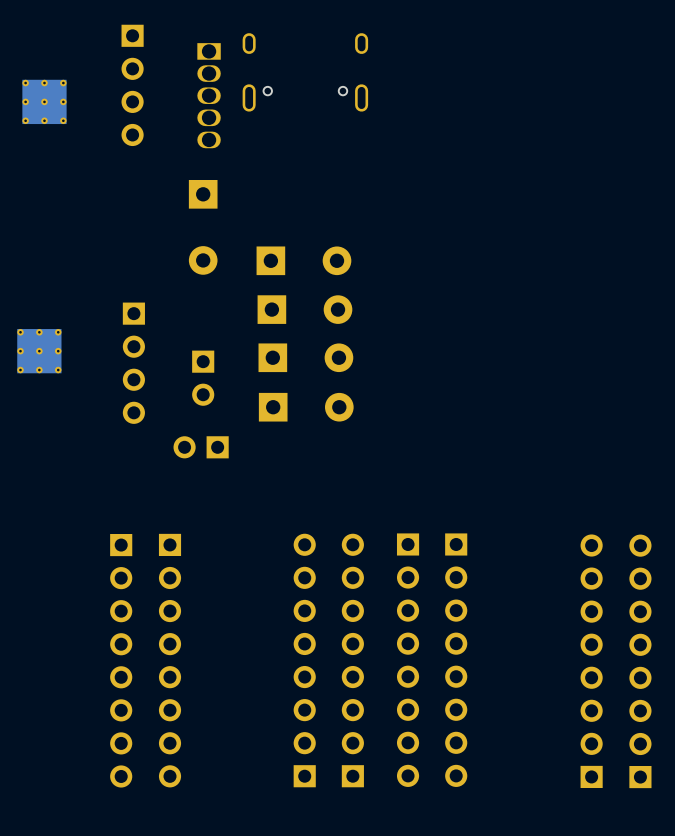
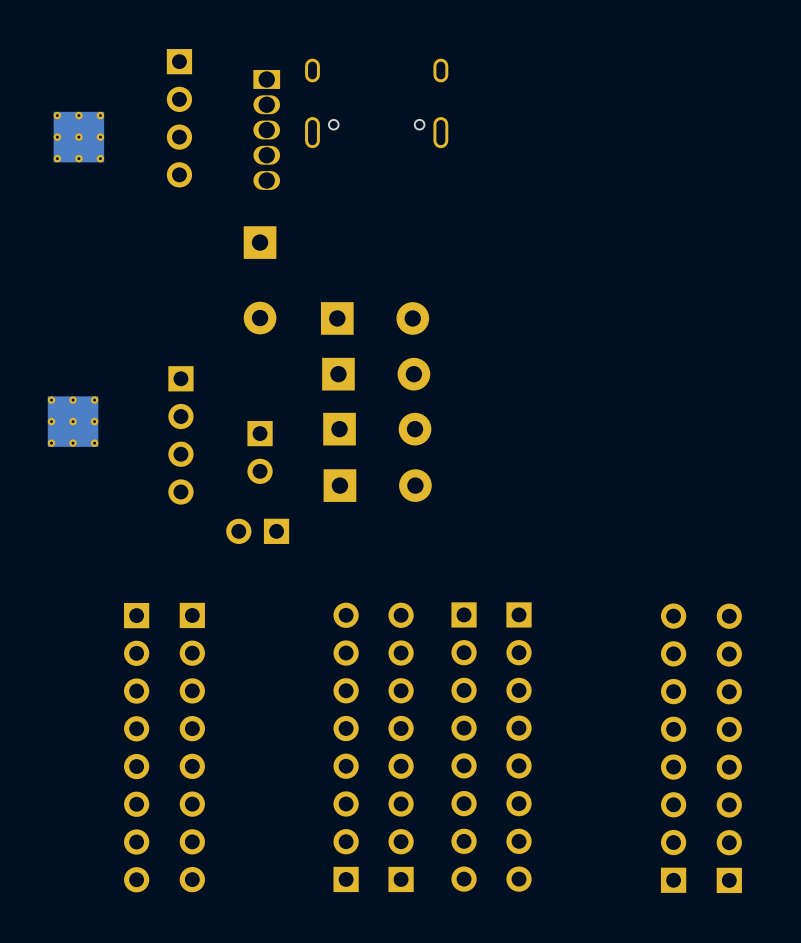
part: none -> (136, 747)
part: none -> (192, 747)
part: none -> (346, 747)
part: none -> (401, 747)
part: none -> (464, 747)
part: none -> (519, 747)
part: none -> (673, 748)
part: none -> (729, 748)
part: (121, 660) -> none
part: (170, 660) -> none
part: (304, 660) -> none
part: (352, 660) -> none
part: (408, 660) -> none
part: (456, 660) -> none
part: (591, 661) -> none
part: (640, 661) -> none

